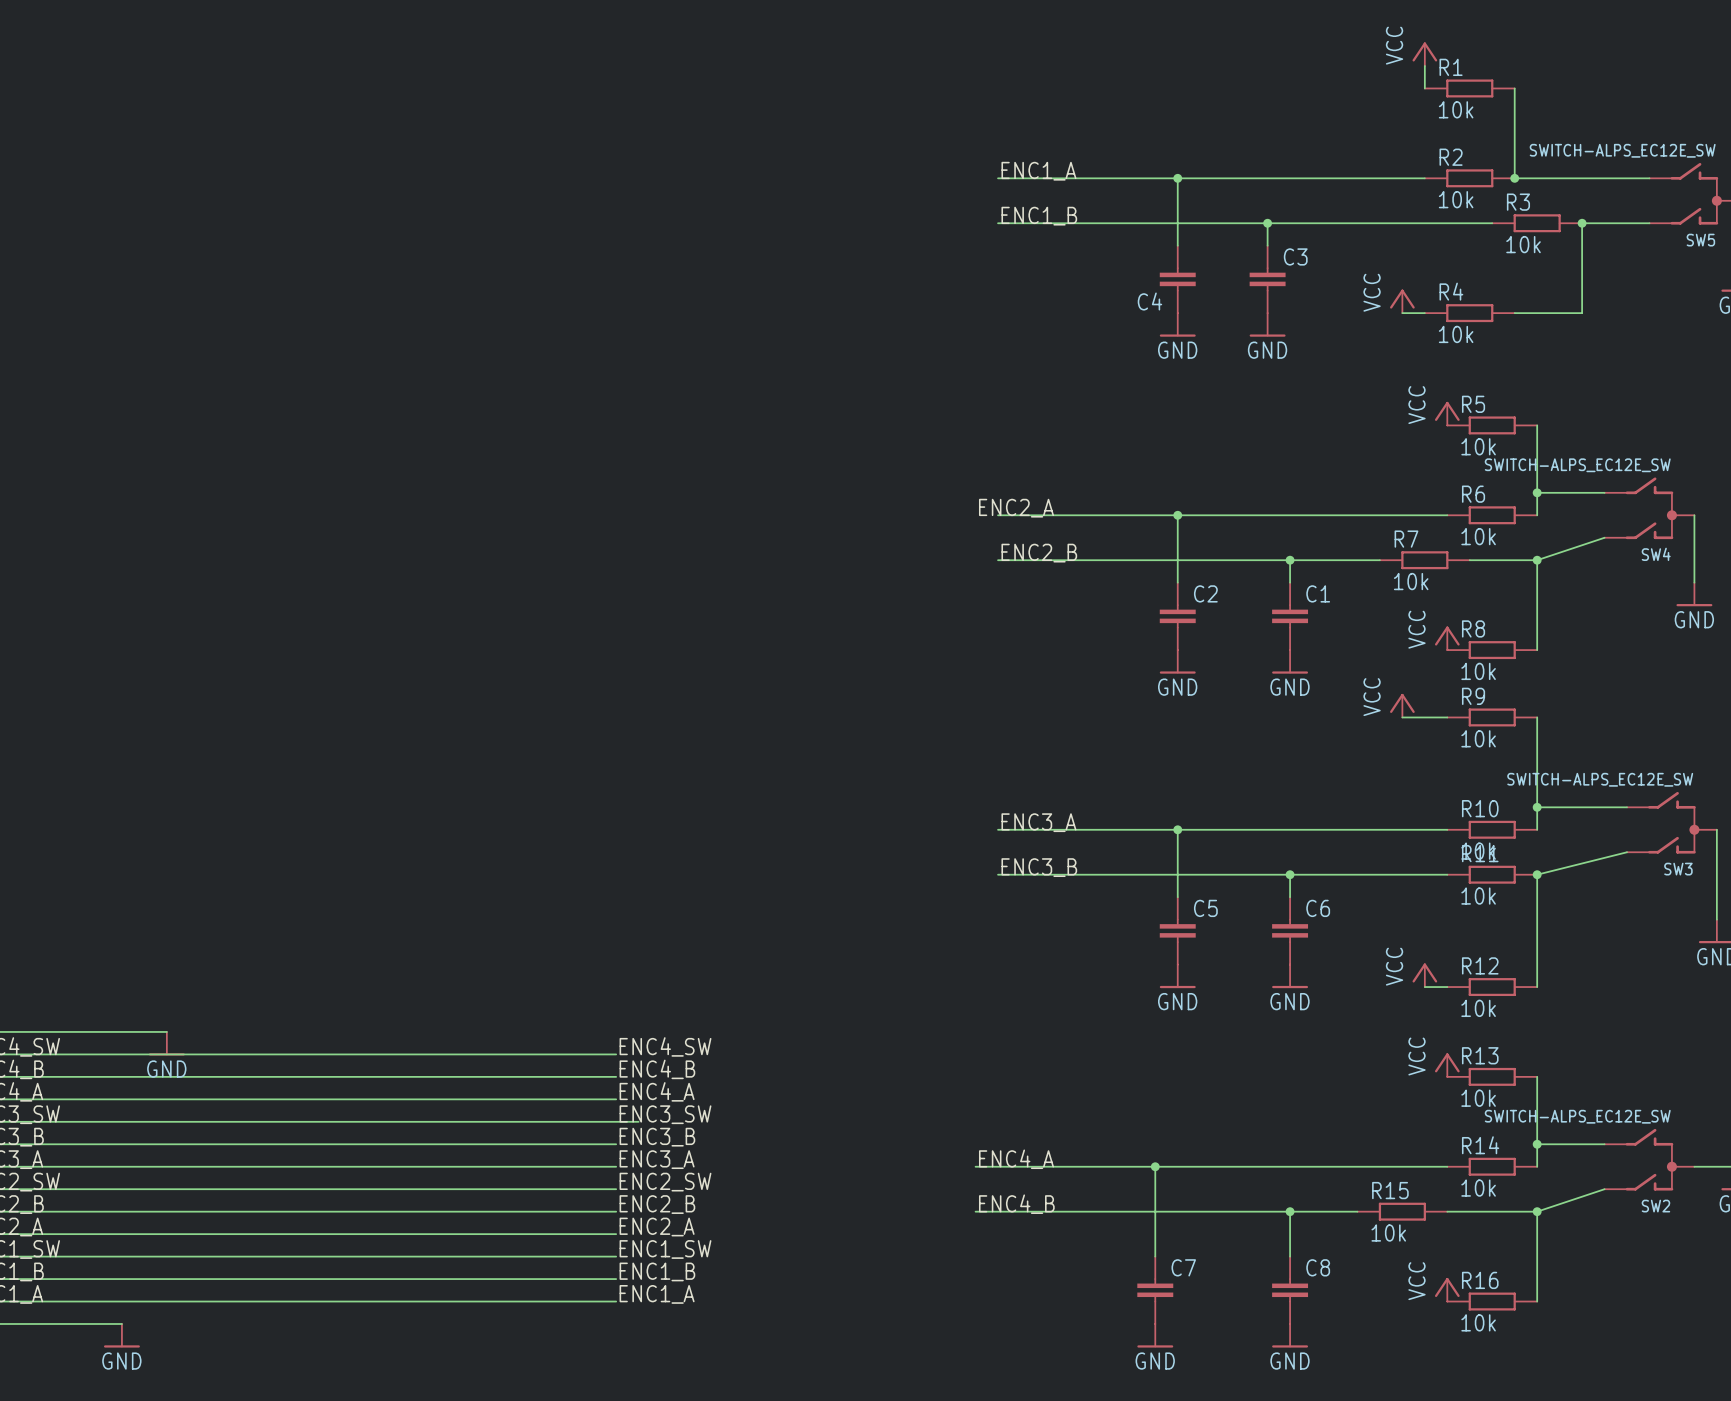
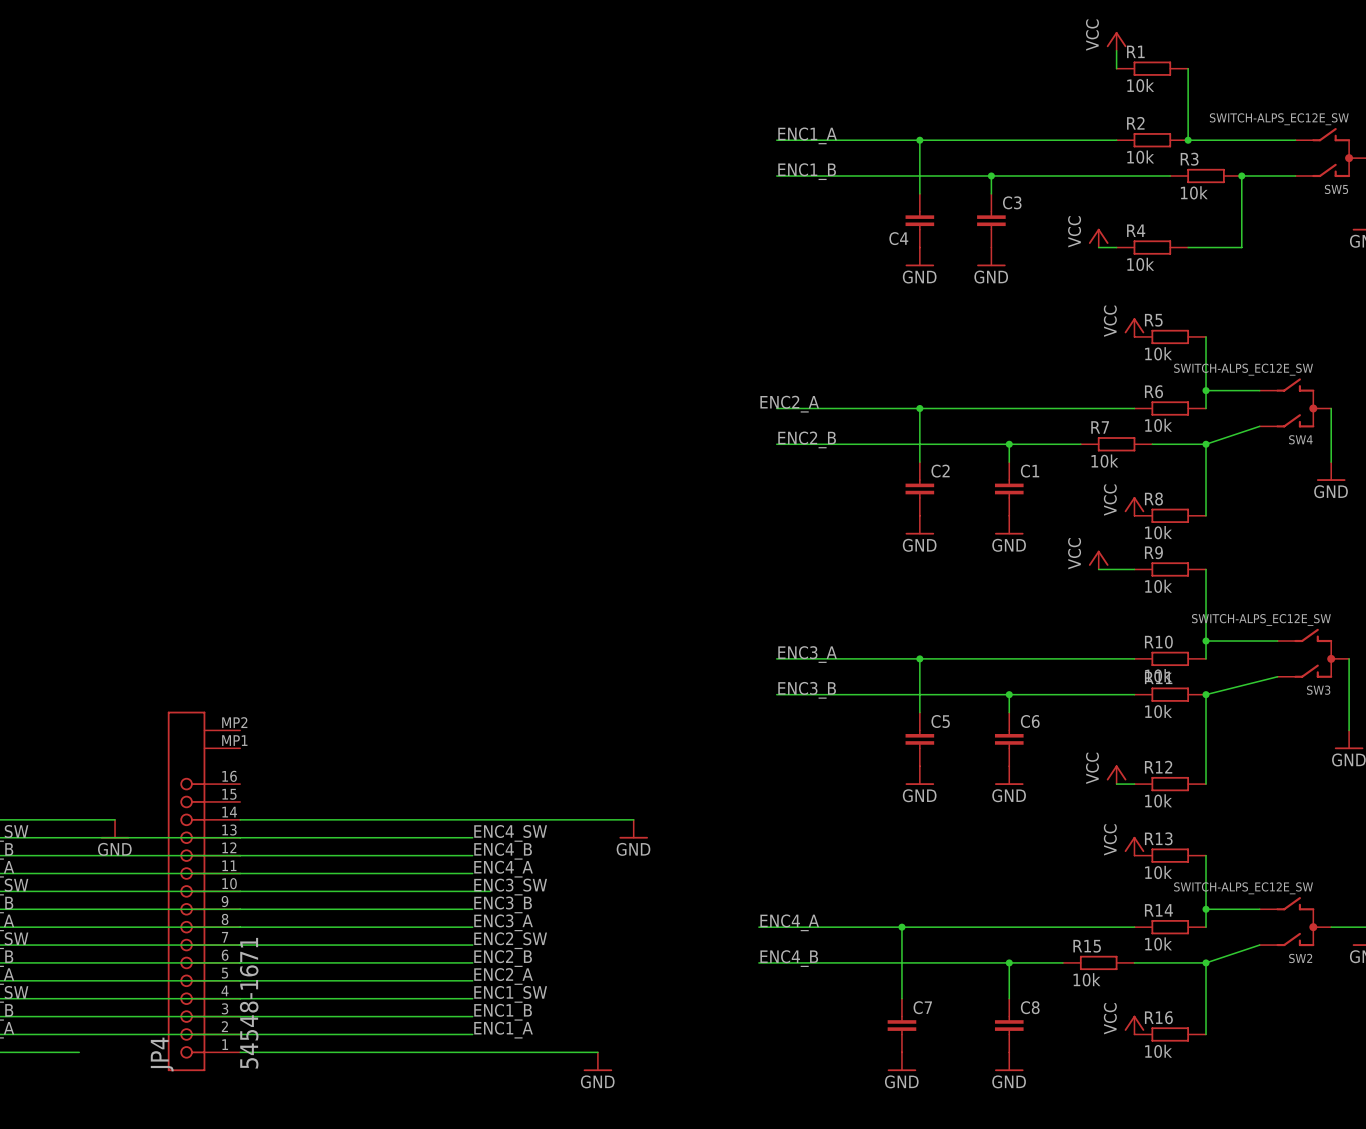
wire: none -> (240, 819) (633, 819)
power symbol: none -> GND (633, 829)
JP4: none -> (204, 891)
wire: none -> (240, 1052) (597, 1052)
power symbol: GND (121, 1335) -> none
power symbol: none -> GND (597, 1061)

